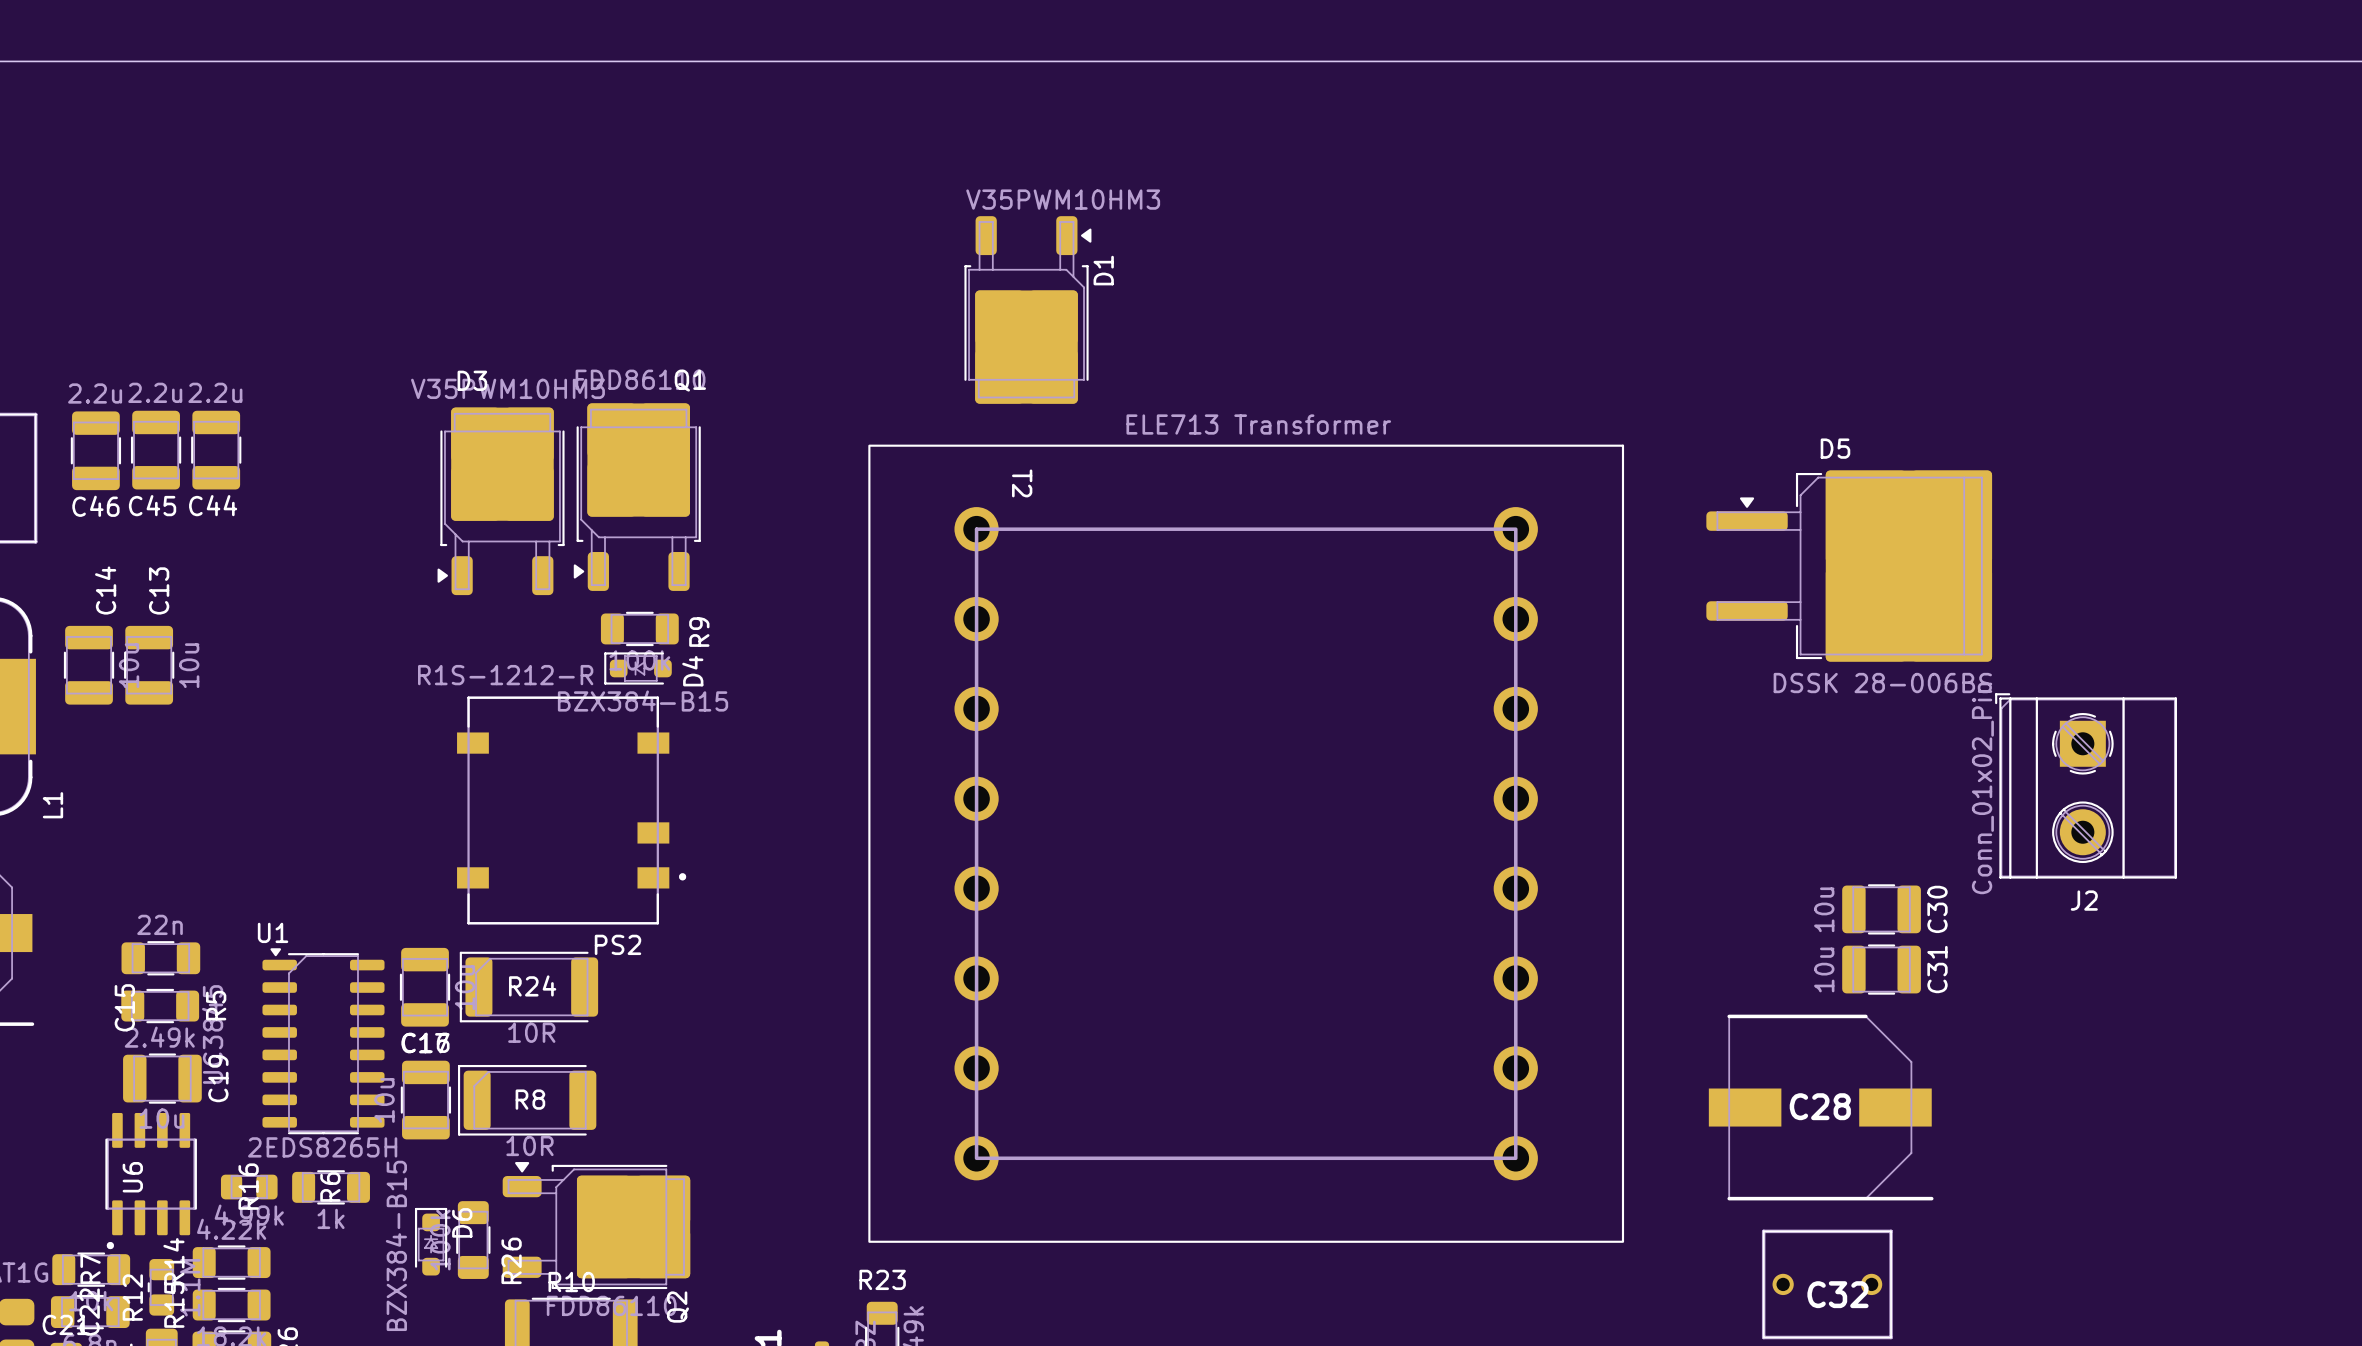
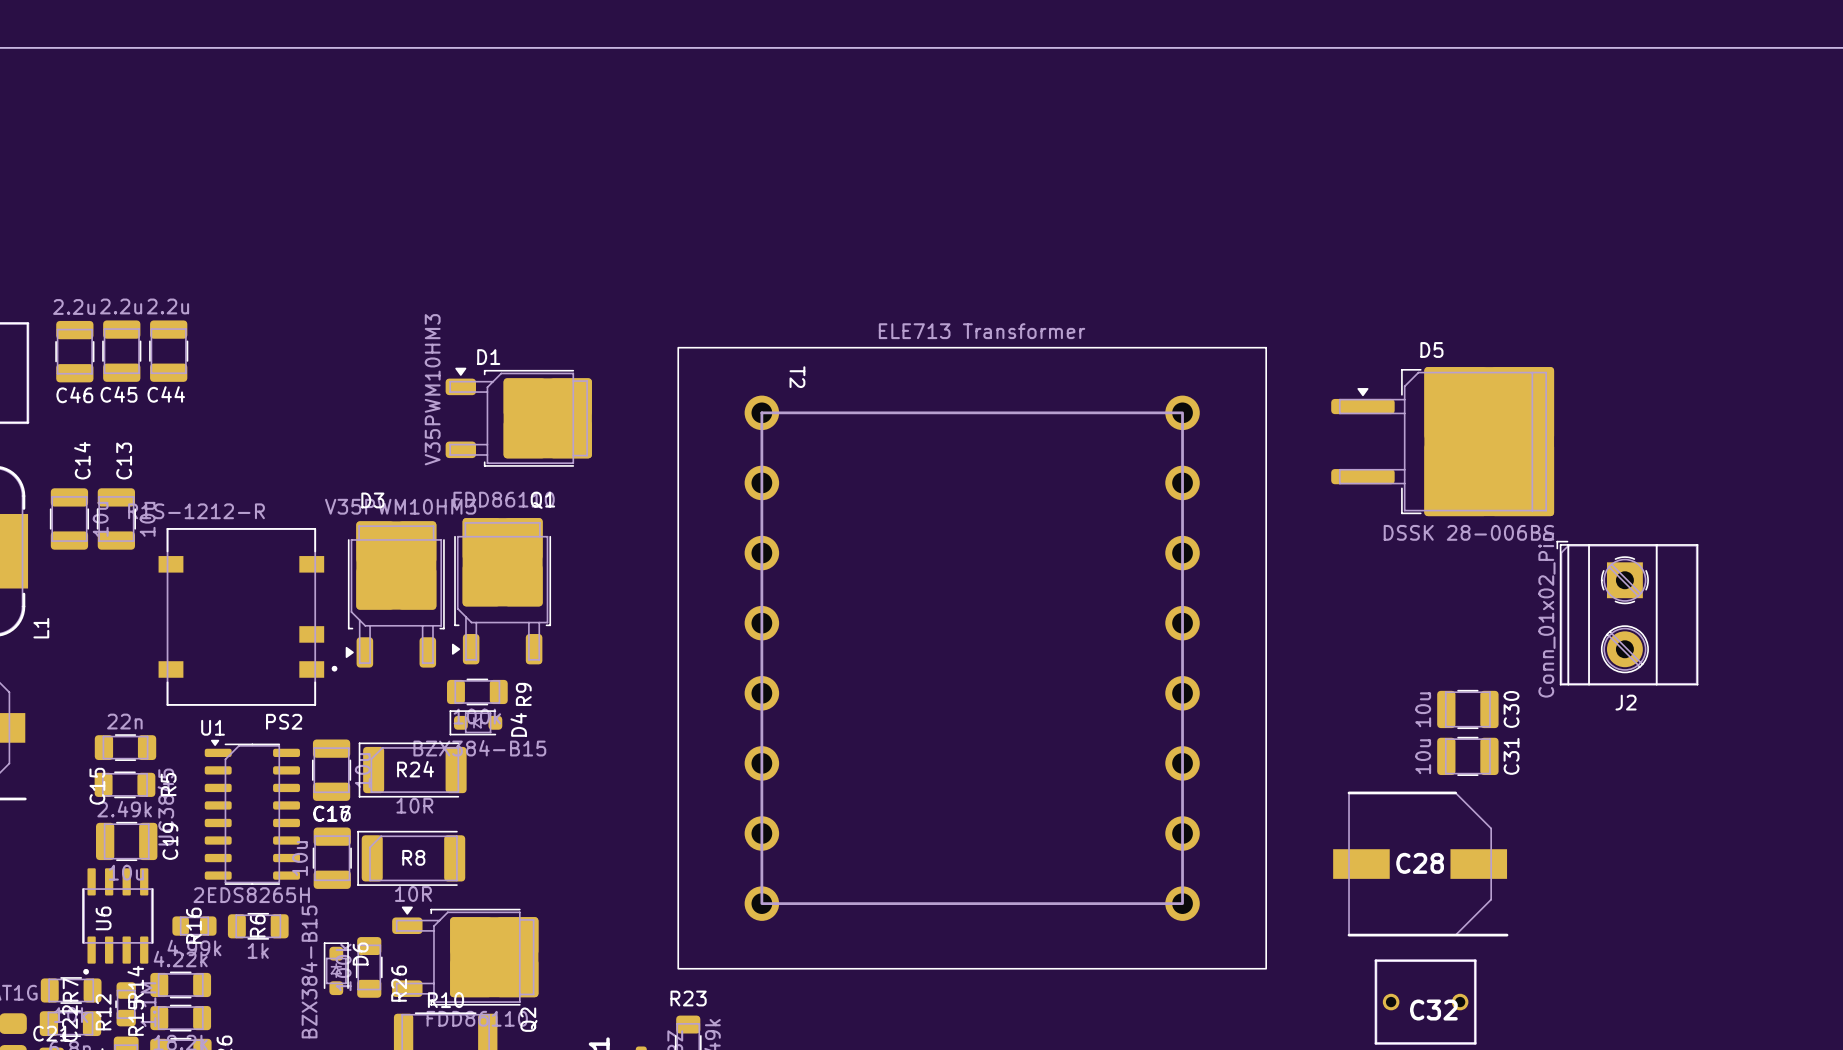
D1 rotation: 0° (1027, 309) -> 90° counterclockwise (518, 417)
D1 position: (1027, 309) -> (518, 417)
Q1 position: (637, 497) -> (501, 591)
D3 position: (501, 501) -> (395, 594)
R9 position: (639, 628) -> (477, 691)
D4 position: (637, 668) -> (475, 722)
PS2 position: (571, 810) -> (247, 616)

